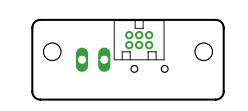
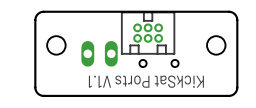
text: none -> KickSat Ports V1.1 (146, 81)

